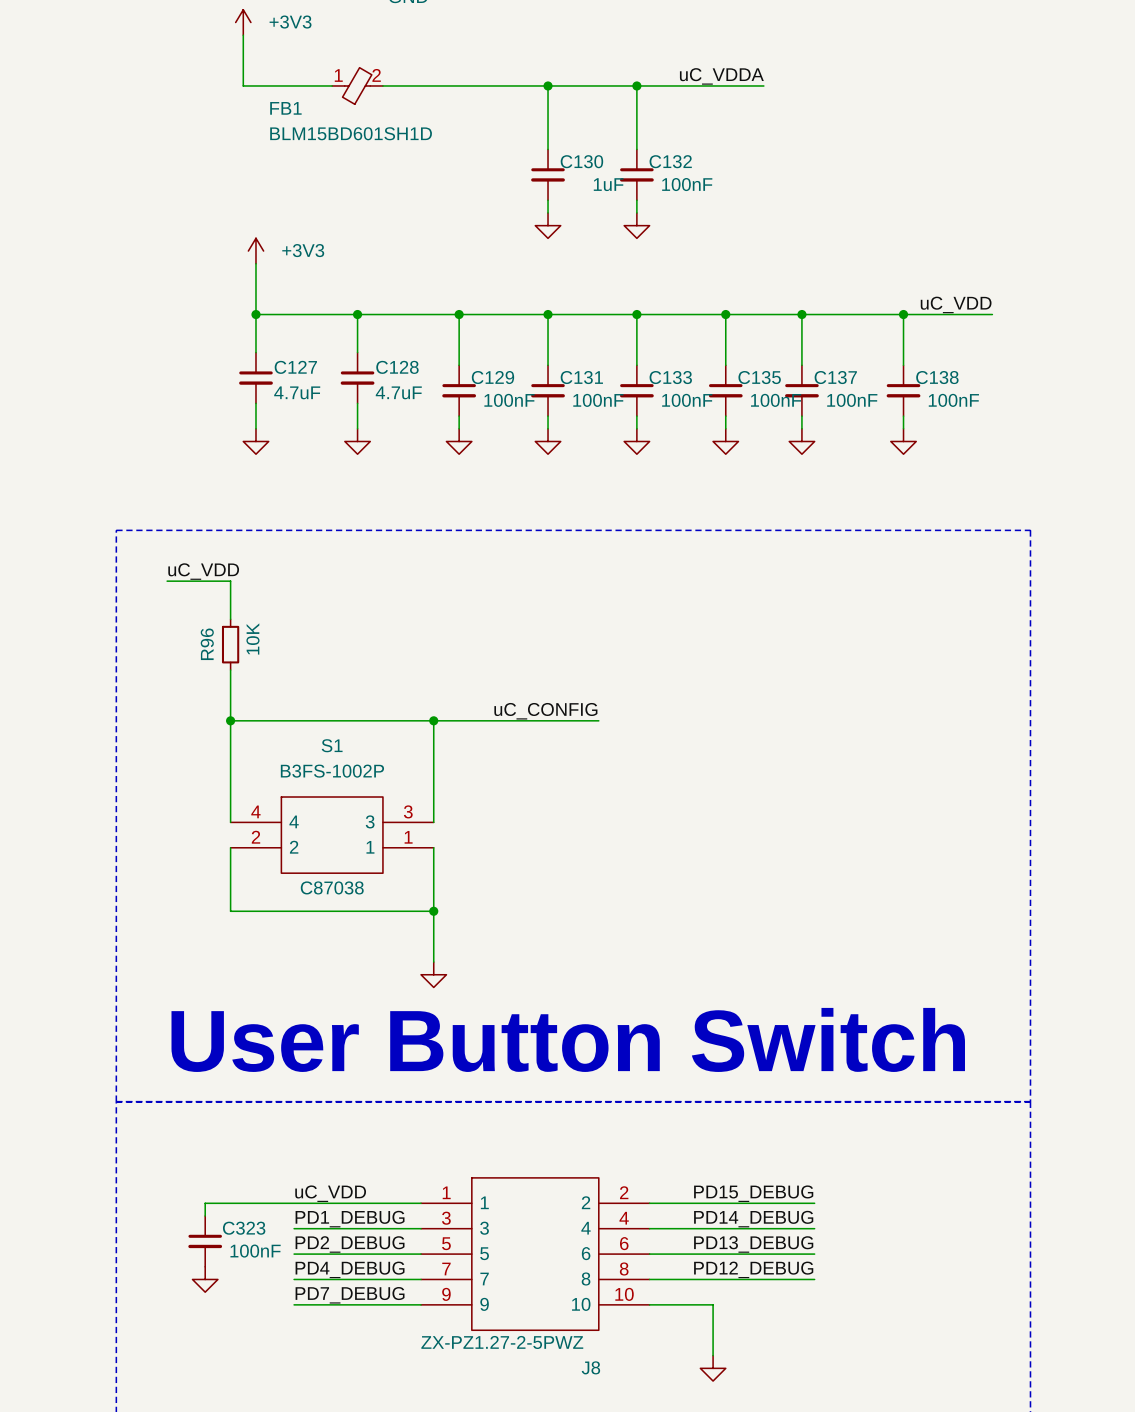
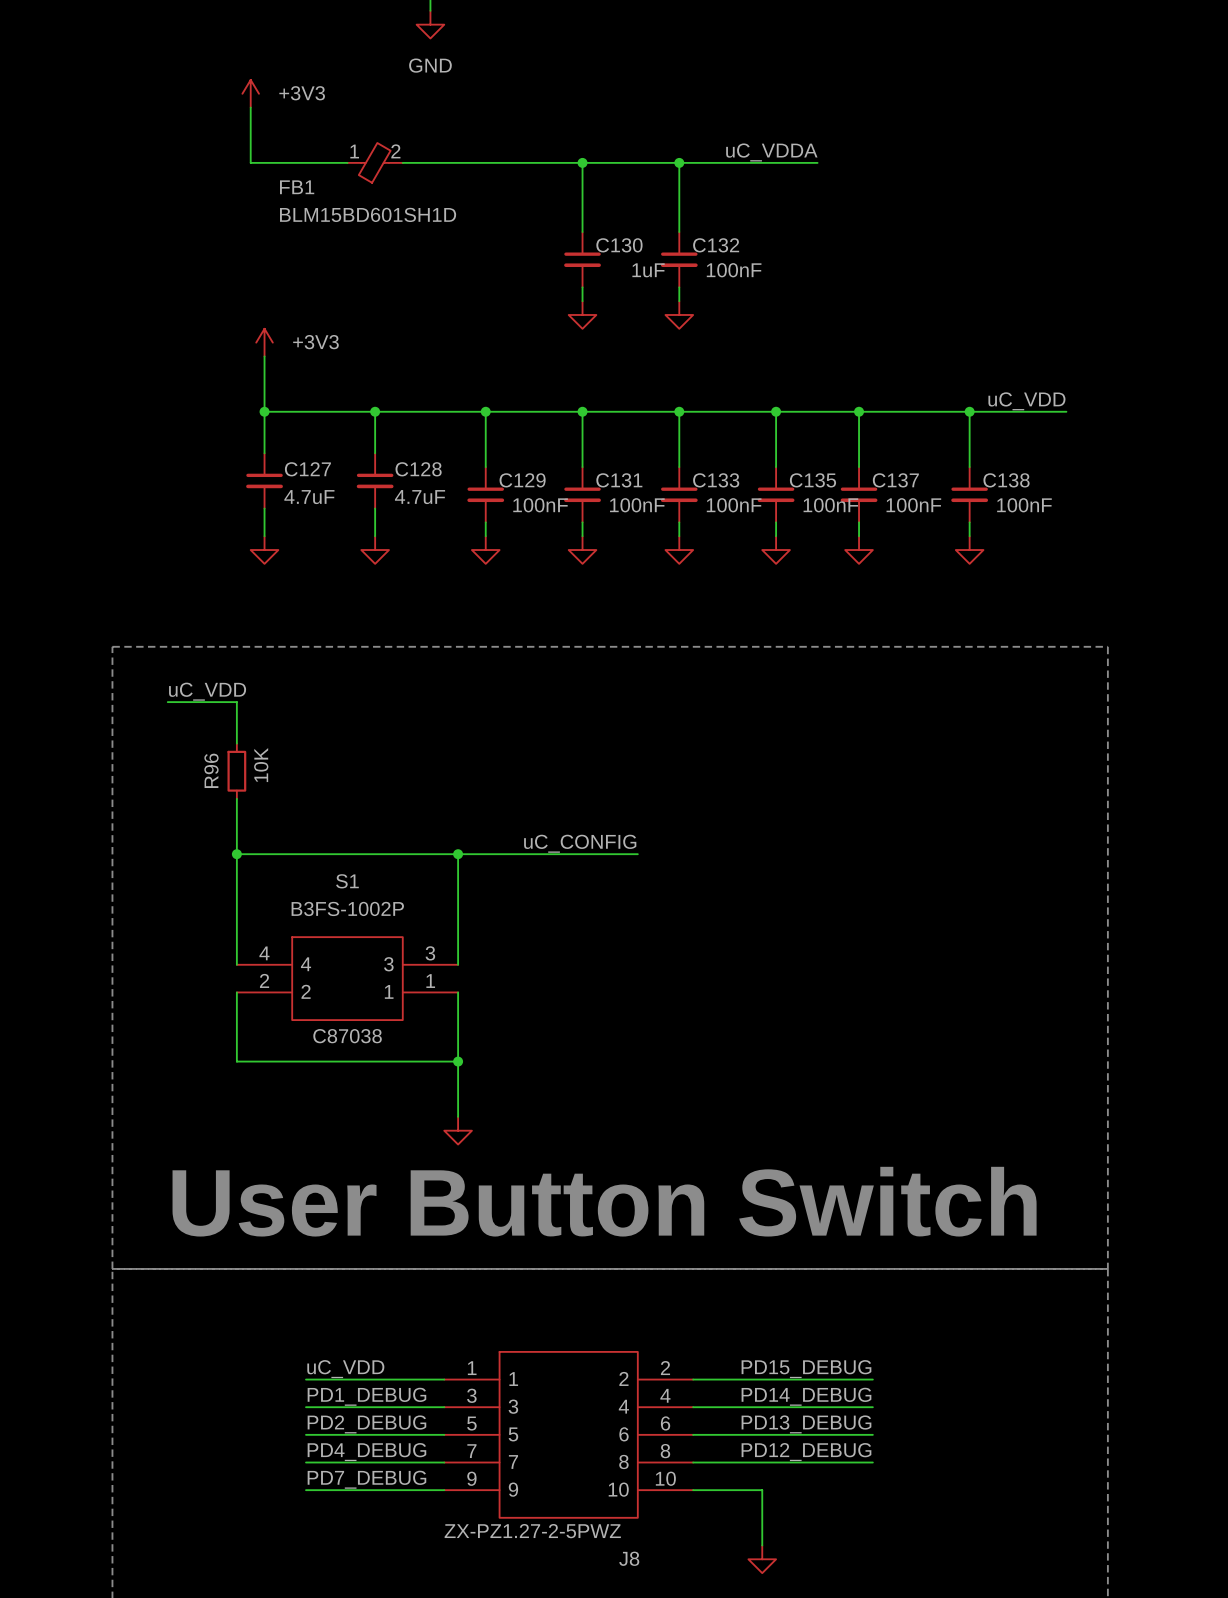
wire: (294, 1203) (205, 1203) (205, 1215) -> none
C323: 100nF (205, 1241) -> none
power symbol: (205, 1279) -> none

